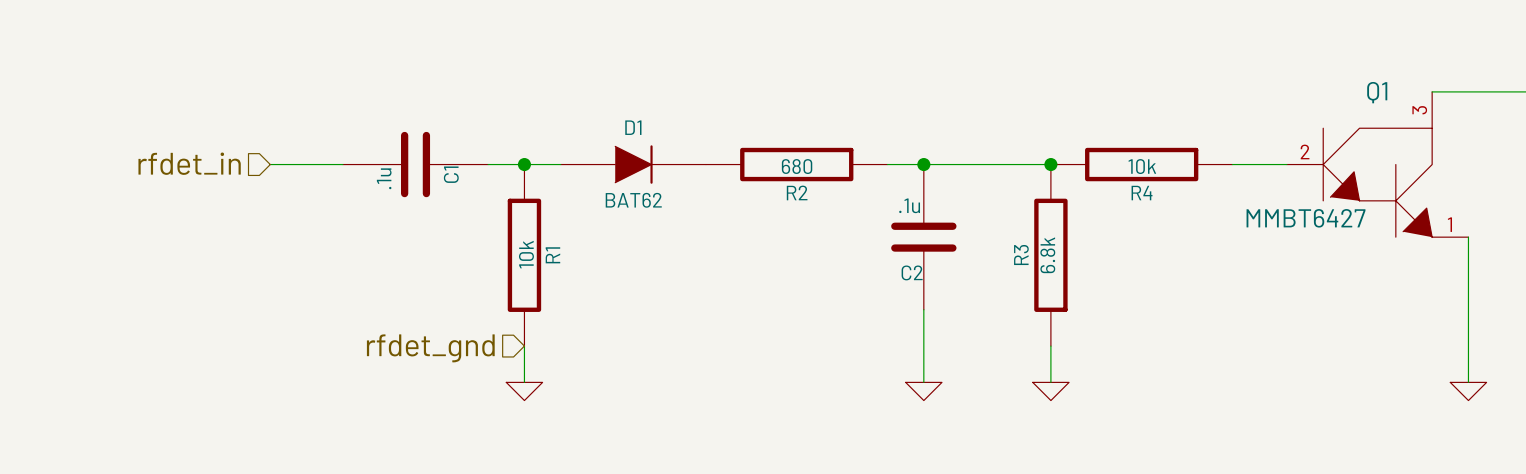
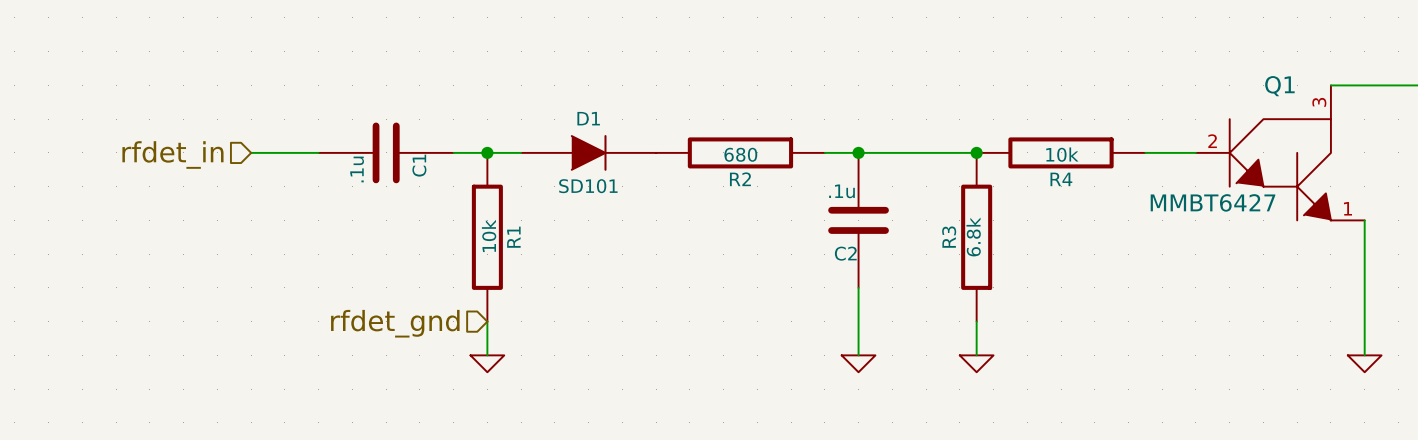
D1 value: BAT62 (633, 200) -> SD101 (588, 186)

